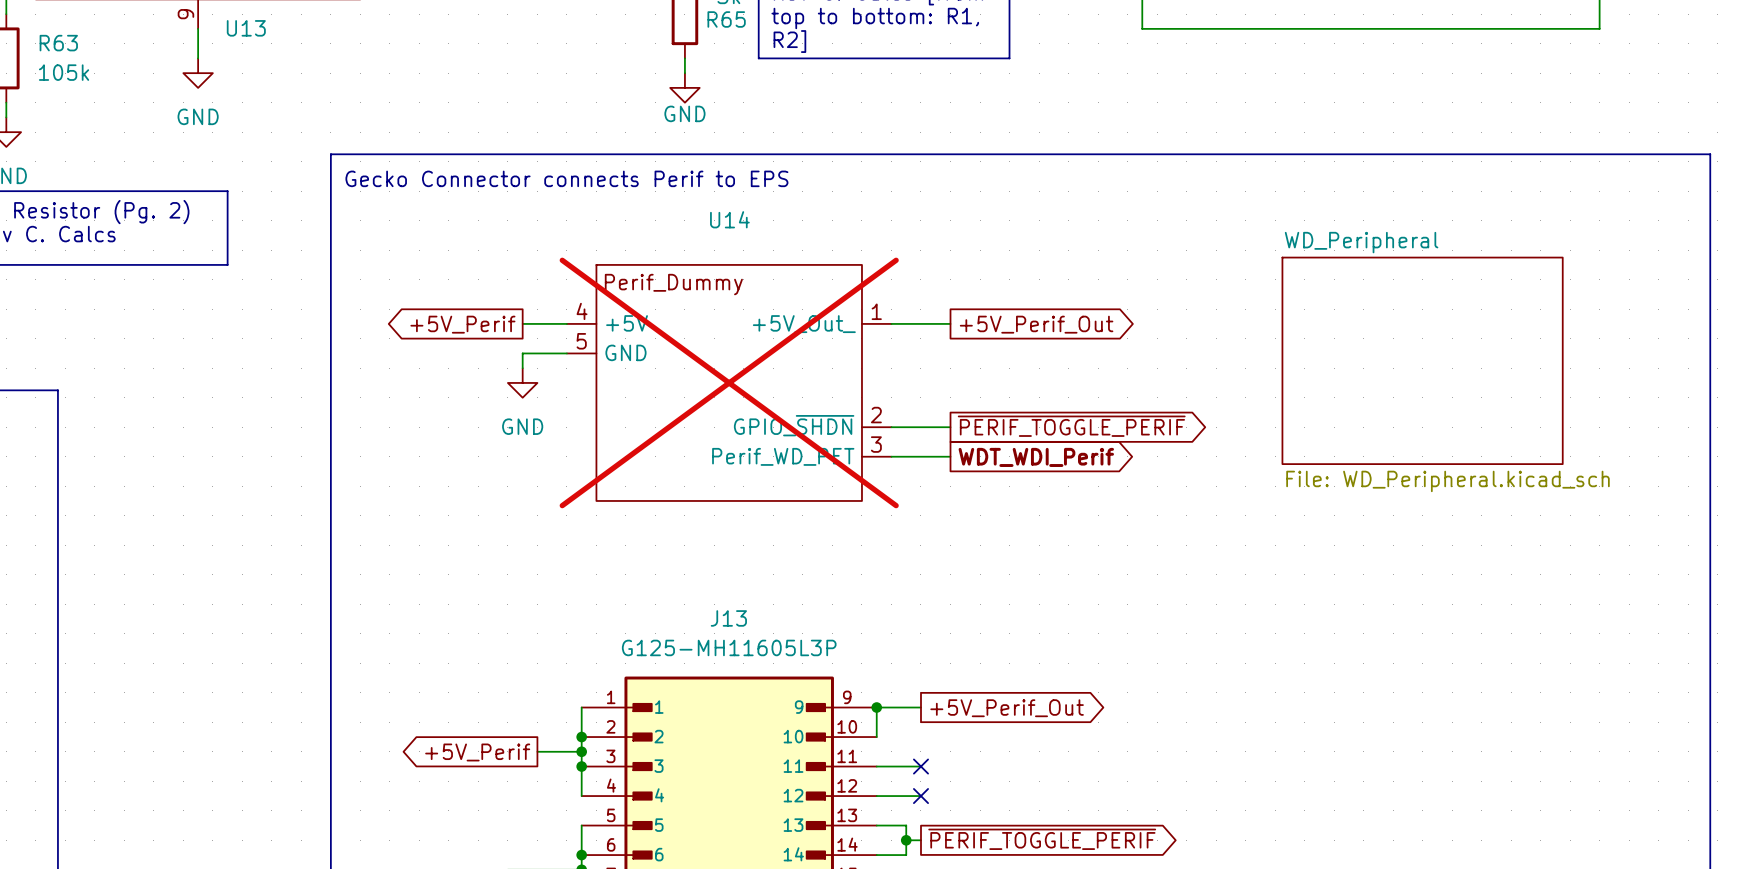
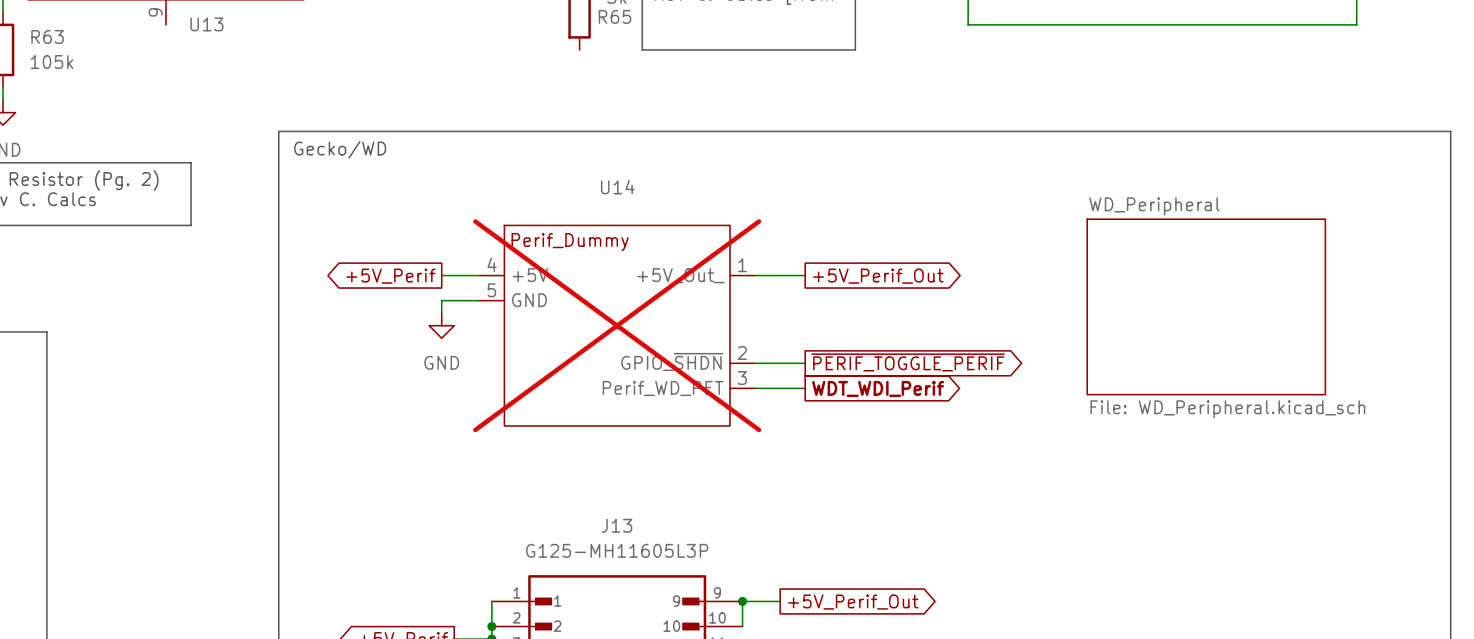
text: top to bottom: R1, (875, 18) -> none
wire: (198, 28) (198, 58) -> none
text: R2] (789, 41) -> none
wire: (684, 58) (684, 73) -> none
power symbol: GND (198, 73) -> none
power symbol: GND (684, 87) -> none
text: none -> Gecko/WD (340, 149)
text: Gecko Connector connects Perif to EPS (566, 178) -> none

